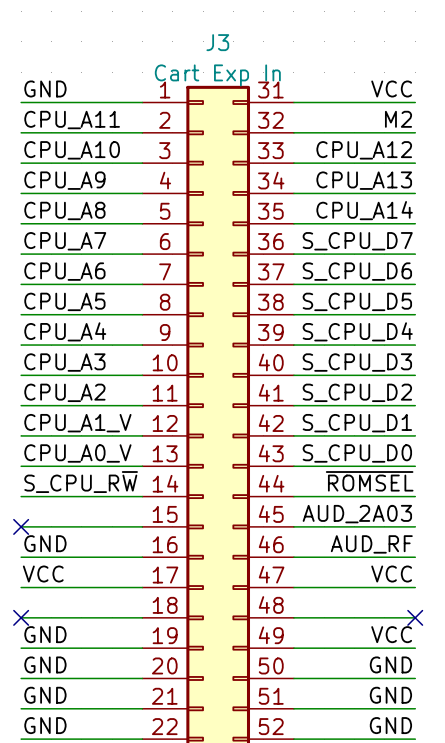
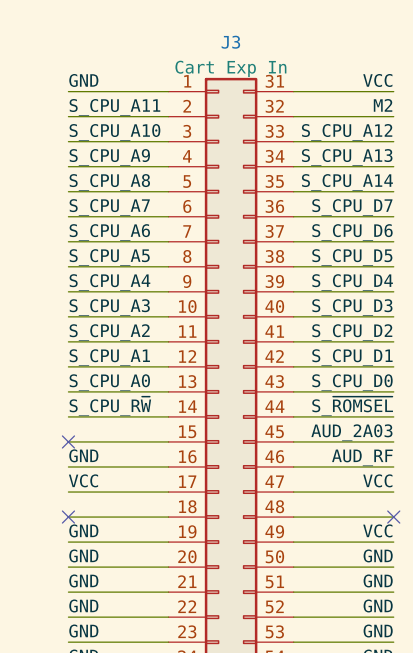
label: CPU_A11 (72, 120) -> S_CPU_A11 (114, 107)
label: CPU_A10 (72, 150) -> S_CPU_A10 (114, 132)
label: CPU_A12 (364, 150) -> S_CPU_A12 (347, 132)
label: CPU_A9 (64, 180) -> S_CPU_A9 (109, 157)
label: CPU_A13 (364, 180) -> S_CPU_A13 (347, 157)
label: CPU_A8 (64, 210) -> S_CPU_A8 (109, 182)
label: CPU_A14 (364, 210) -> S_CPU_A14 (347, 182)
label: CPU_A7 (65, 241) -> S_CPU_A7 (109, 207)
label: CPU_A6 (64, 271) -> S_CPU_A6 (109, 232)
label: CPU_A5 (64, 301) -> S_CPU_A5 (109, 257)
label: CPU_A4 (65, 331) -> S_CPU_A4 (109, 282)
label: CPU_A3 (64, 362) -> S_CPU_A3 (109, 307)
label: CPU_A2 (64, 392) -> S_CPU_A2 (109, 332)
label: CPU_A1_V (77, 423) -> S_CPU_A1 (109, 357)
label: CPU_A0_V (77, 453) -> S_CPU_A0 (109, 382)
label: ~{ROMSEL} (369, 481) -> S_~{ROMSEL} (352, 406)

